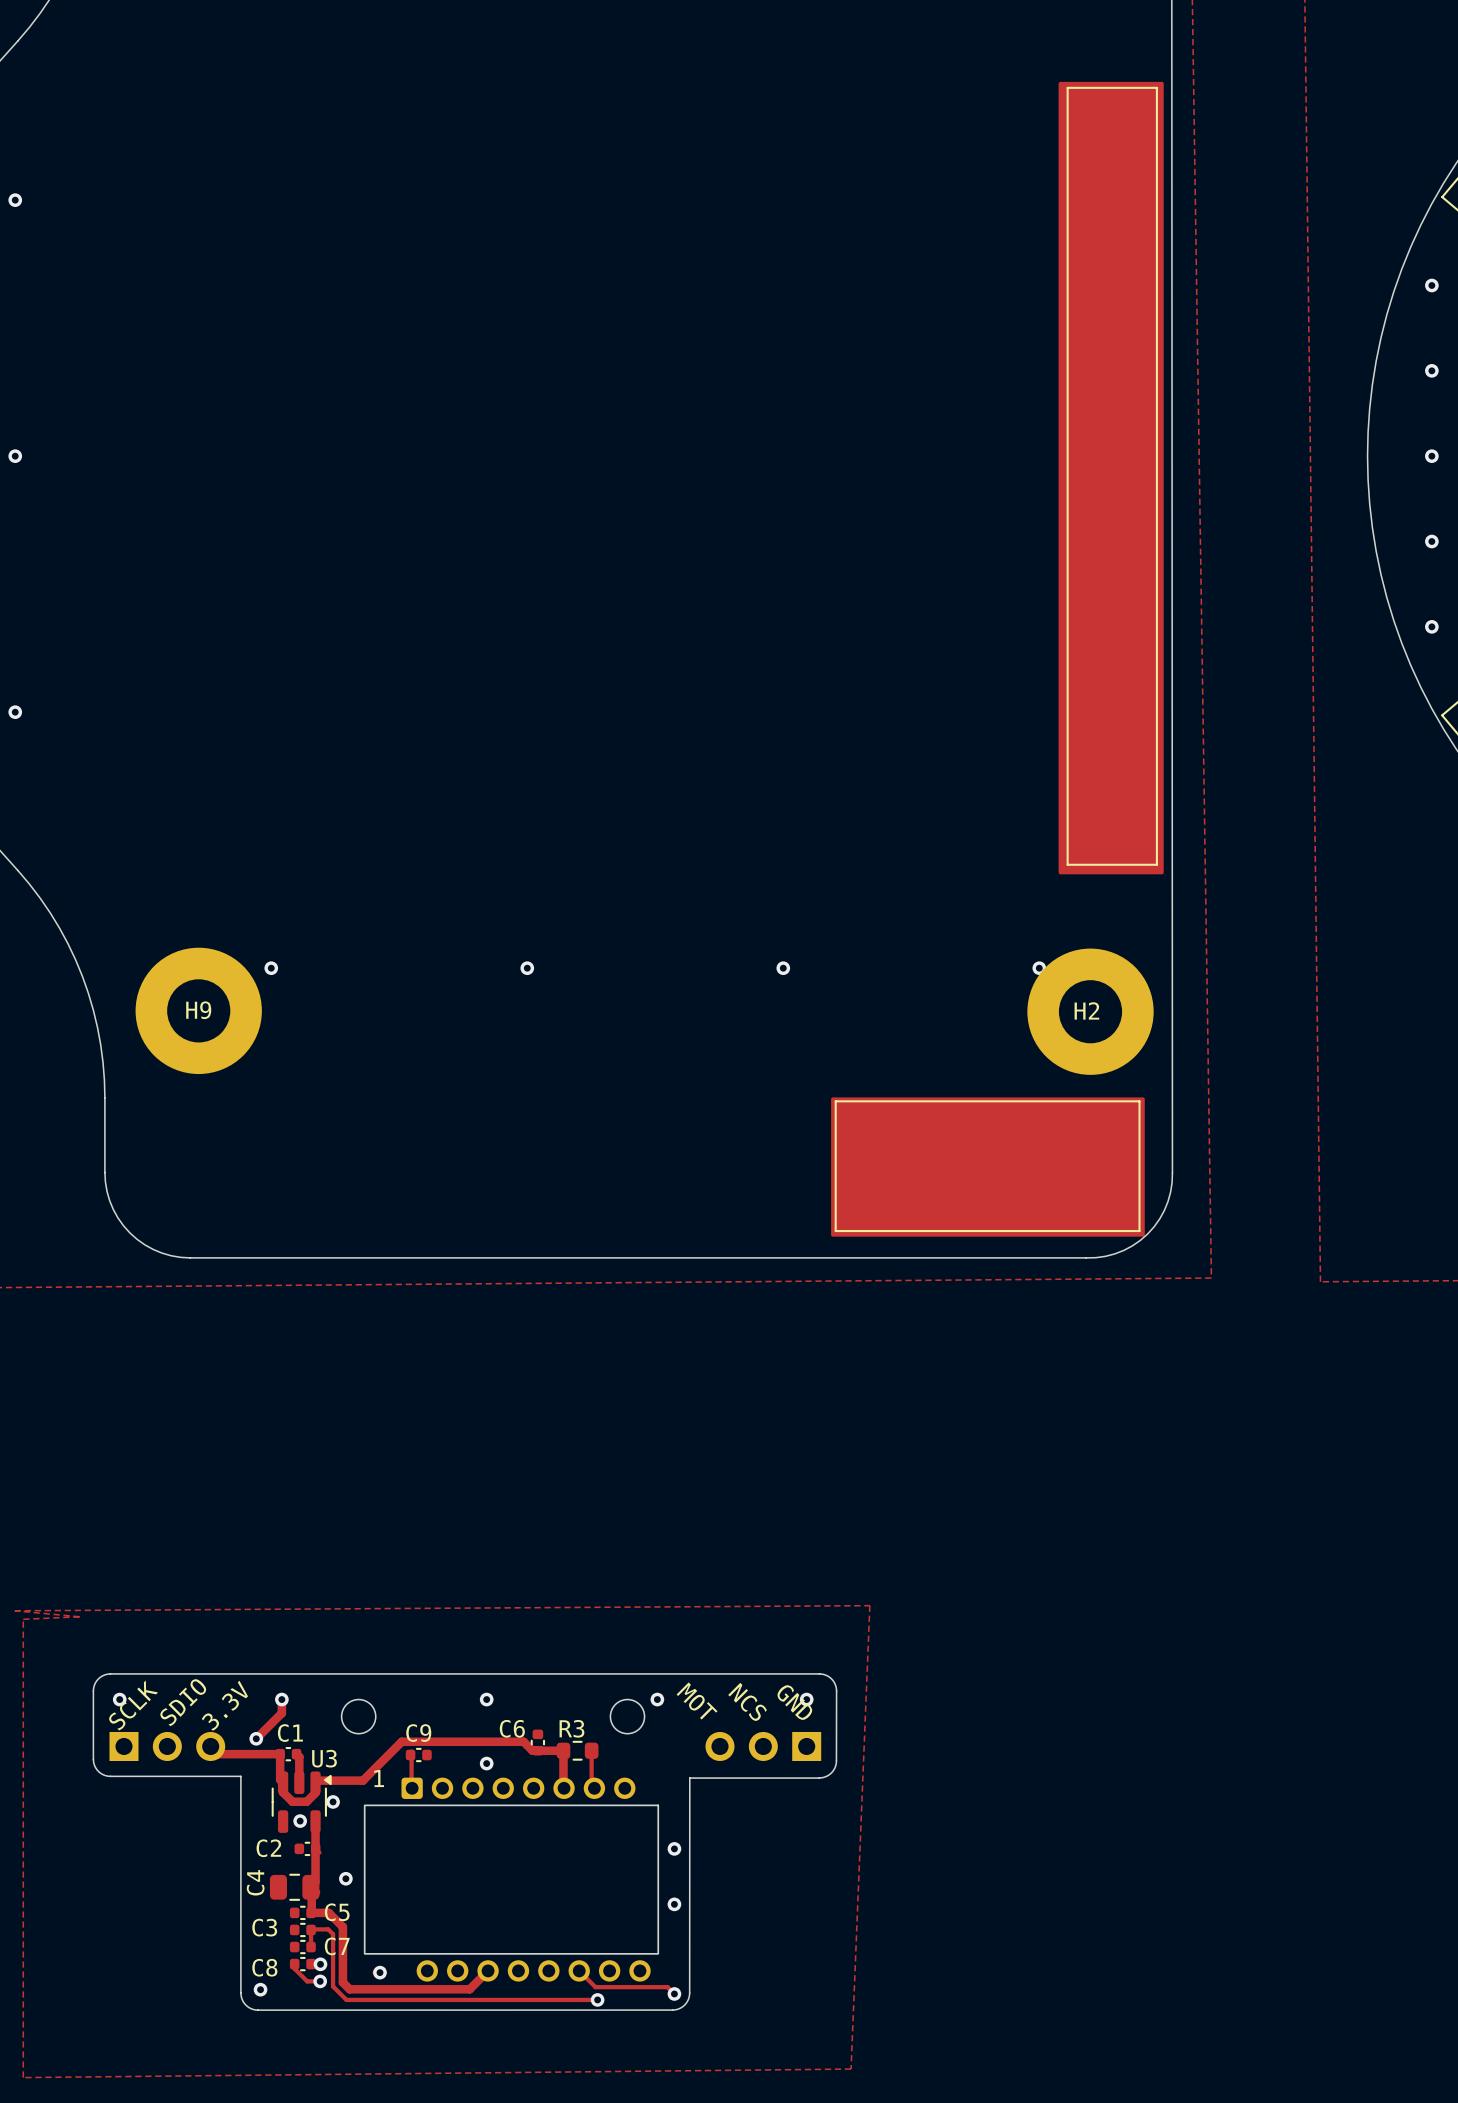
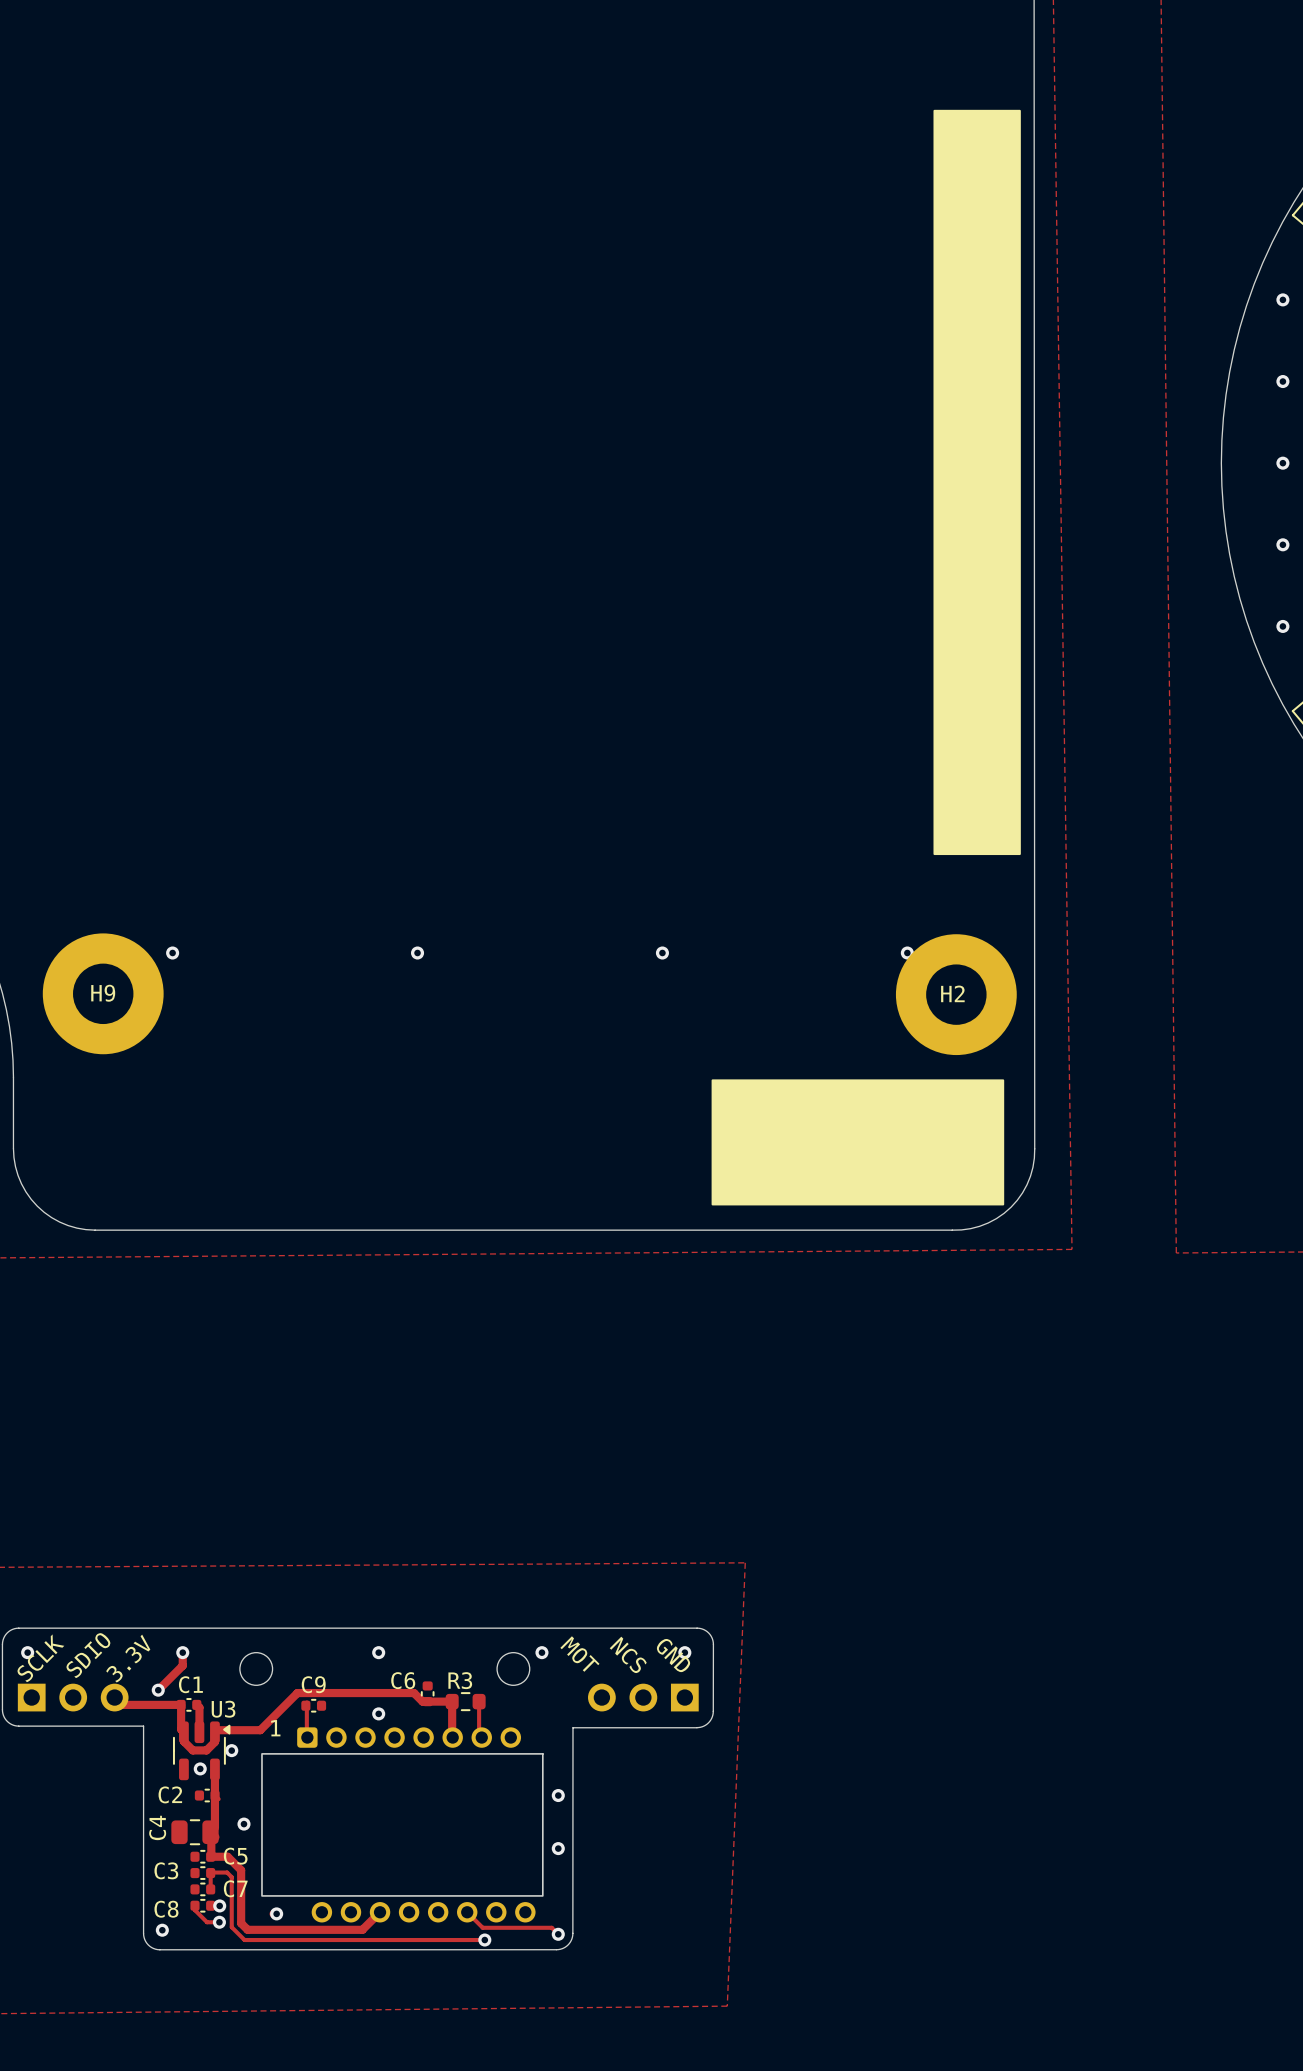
drawing shape: [1058, 81, 1164, 875] -> [933, 109, 1021, 856]
line: (1067, 87) (1156, 87) (1156, 864) (1067, 864) (1067, 87) -> none
drawing shape: [831, 1097, 1145, 1237] -> [711, 1079, 1005, 1206]
line: (835, 1101) (1139, 1101) (1139, 1231) (835, 1231) (835, 1101) -> none

